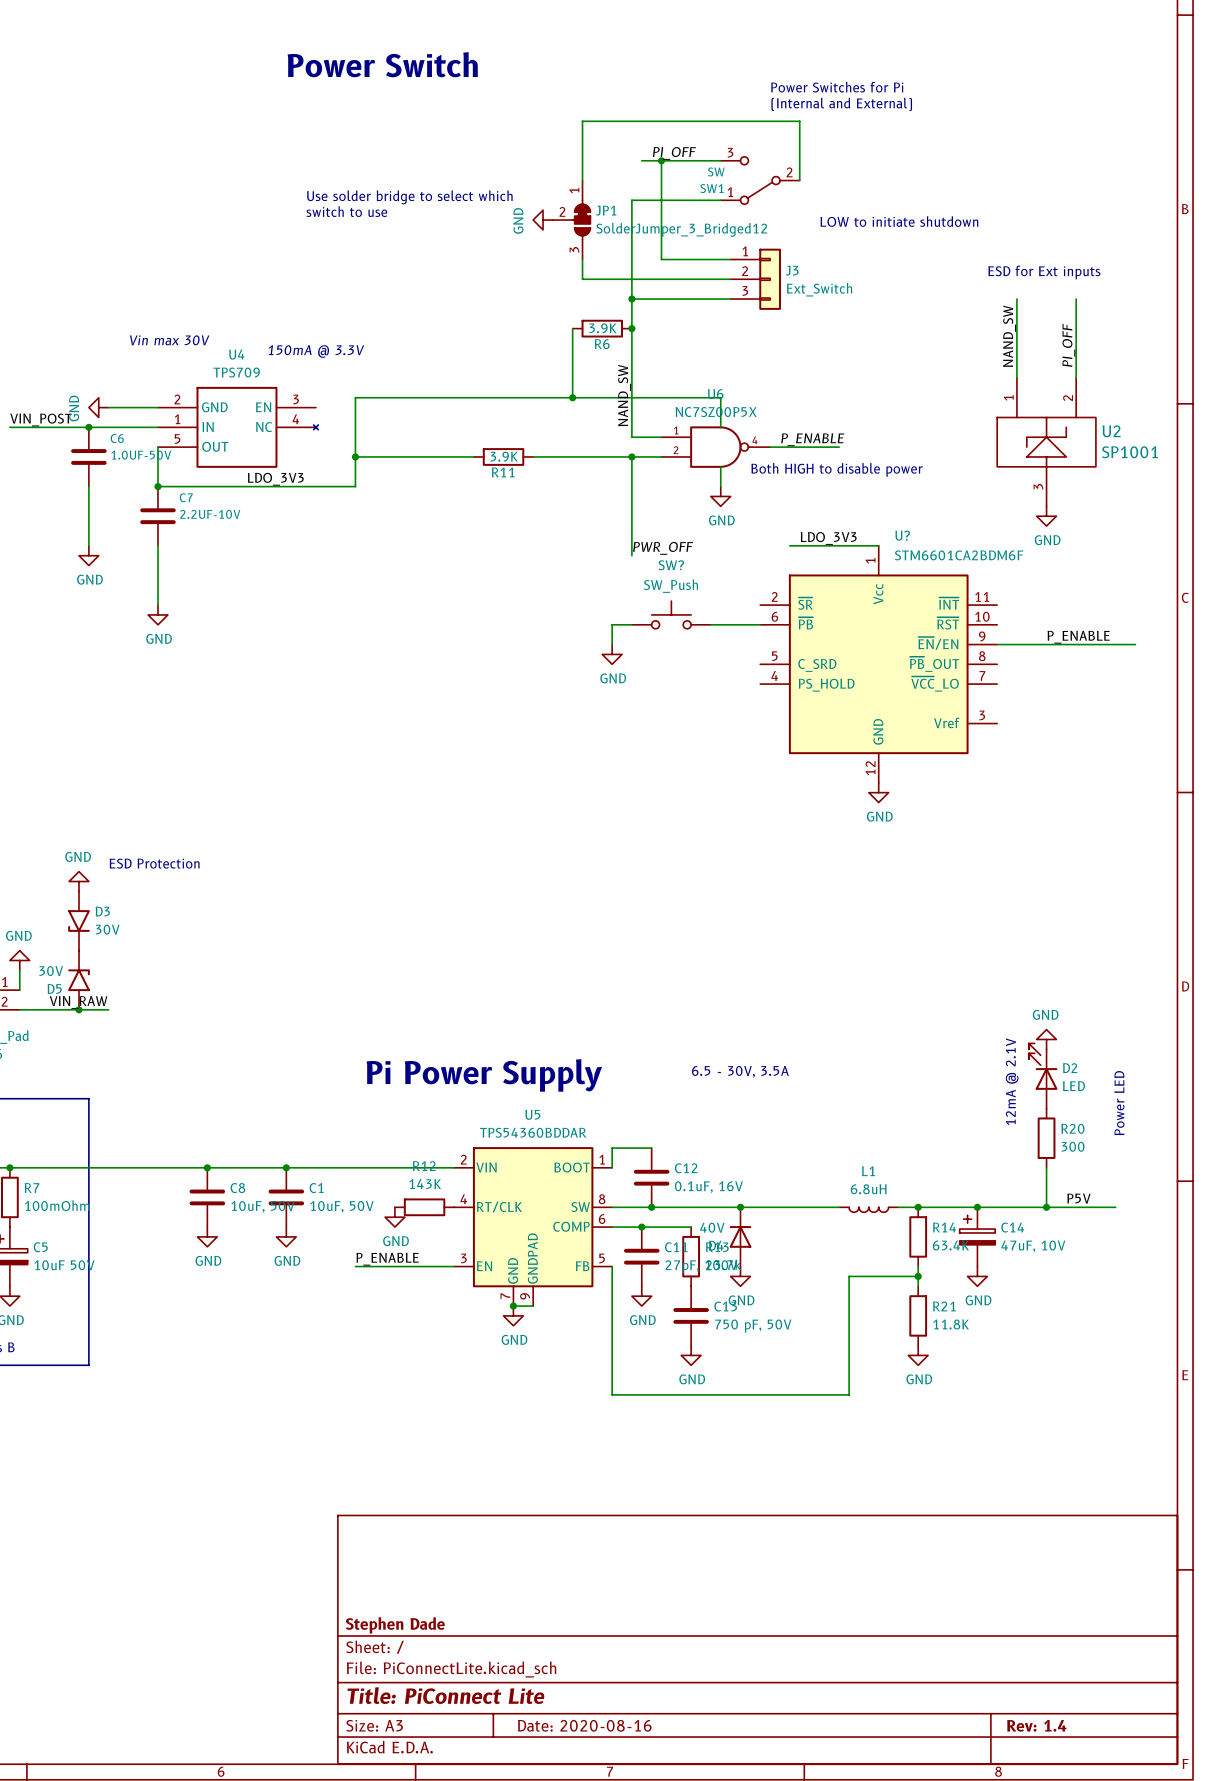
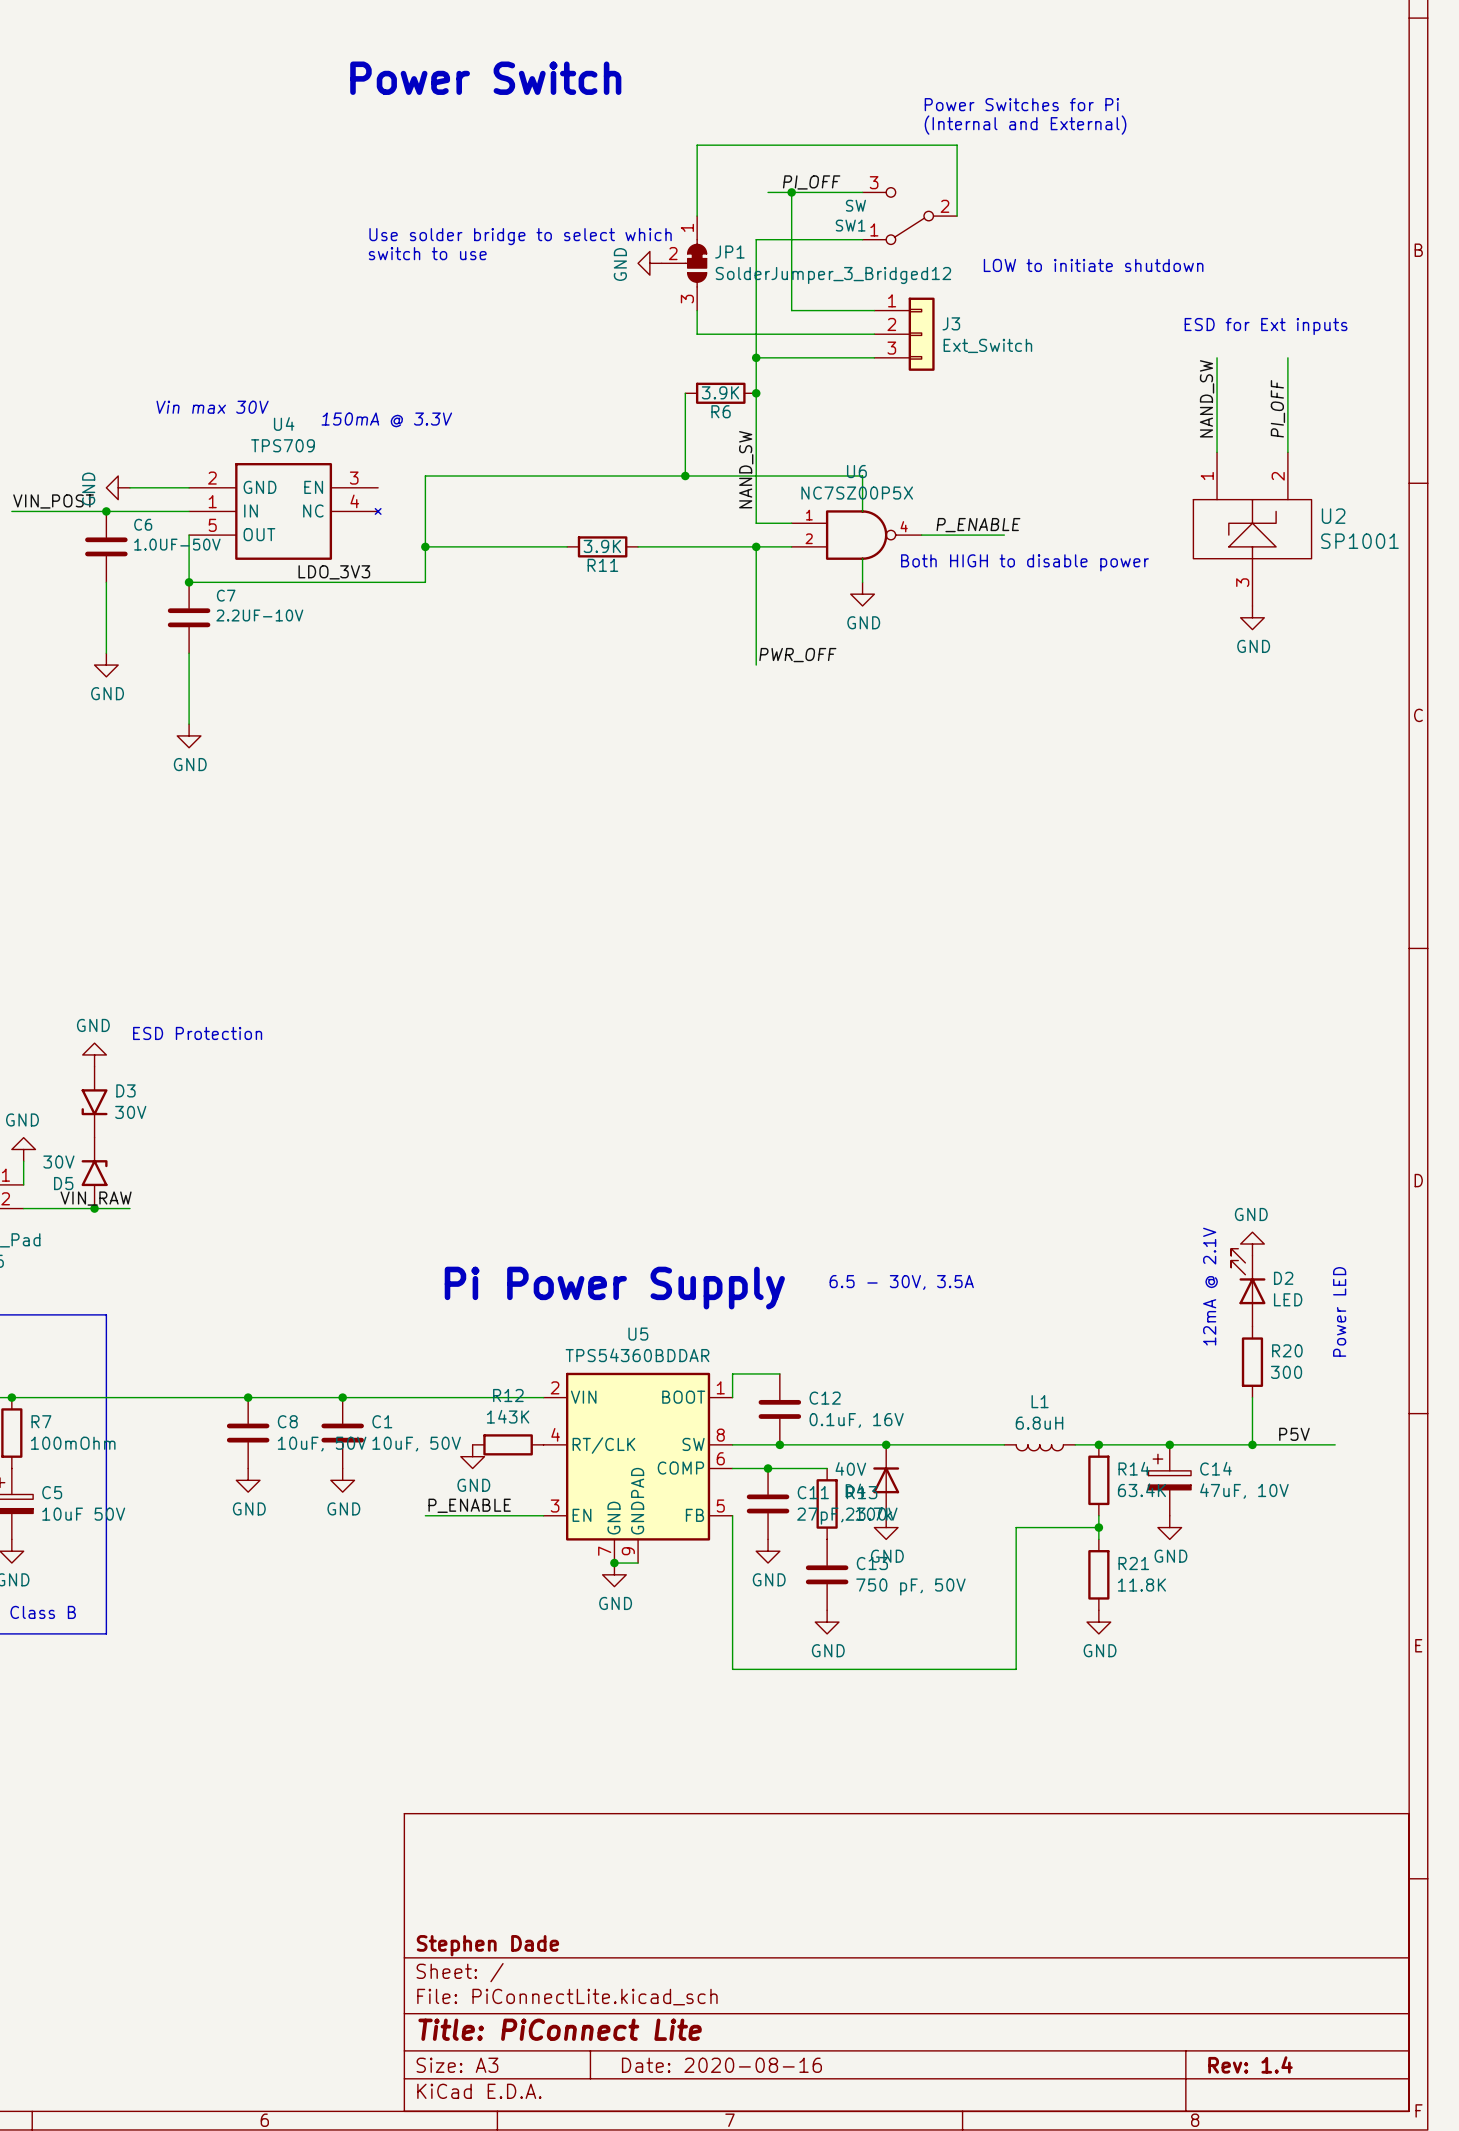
label: LDO_3V3 (828, 538) -> none
wire: (789, 545) (878, 545) -> none
SW?: SW_Push (671, 614) -> none
wire: (631, 624) (612, 624) (612, 644) -> none
wire: (710, 624) (760, 624) -> none
label: P_ENABLE (1078, 637) -> none
wire: (997, 644) (1135, 644) -> none
power symbol: GND (612, 654) -> none
U?: STM6601CA2BDM6F (878, 664) -> none
power symbol: GND (878, 792) -> none

